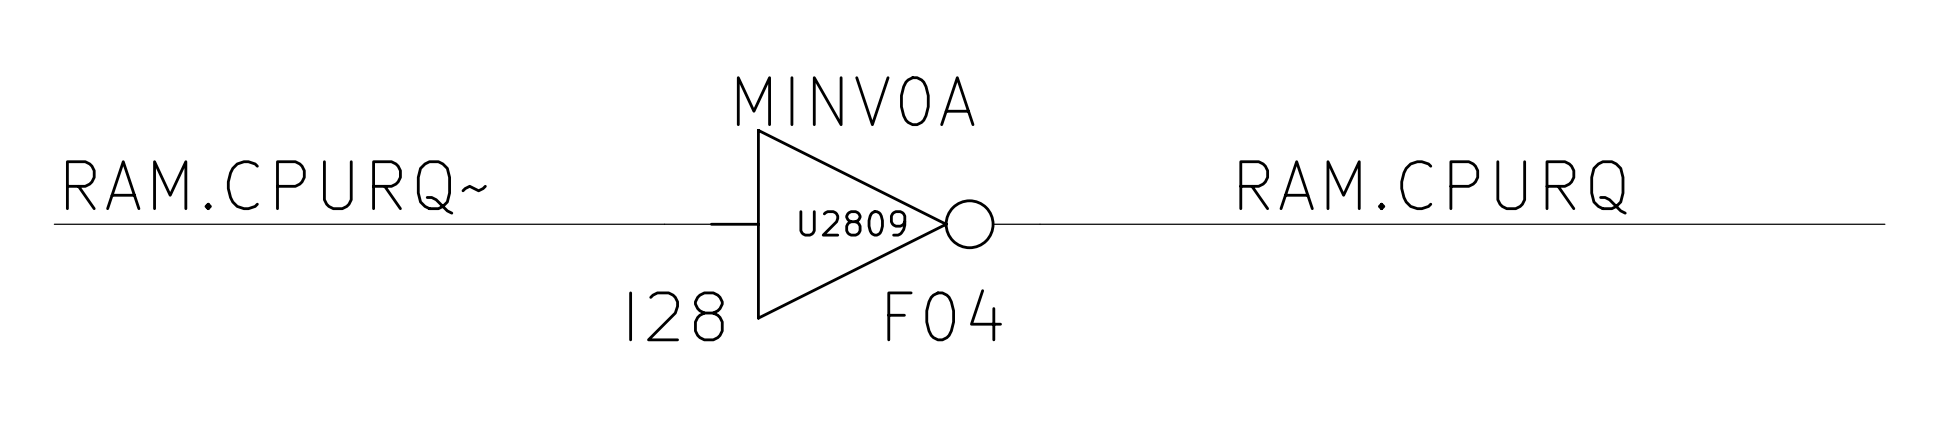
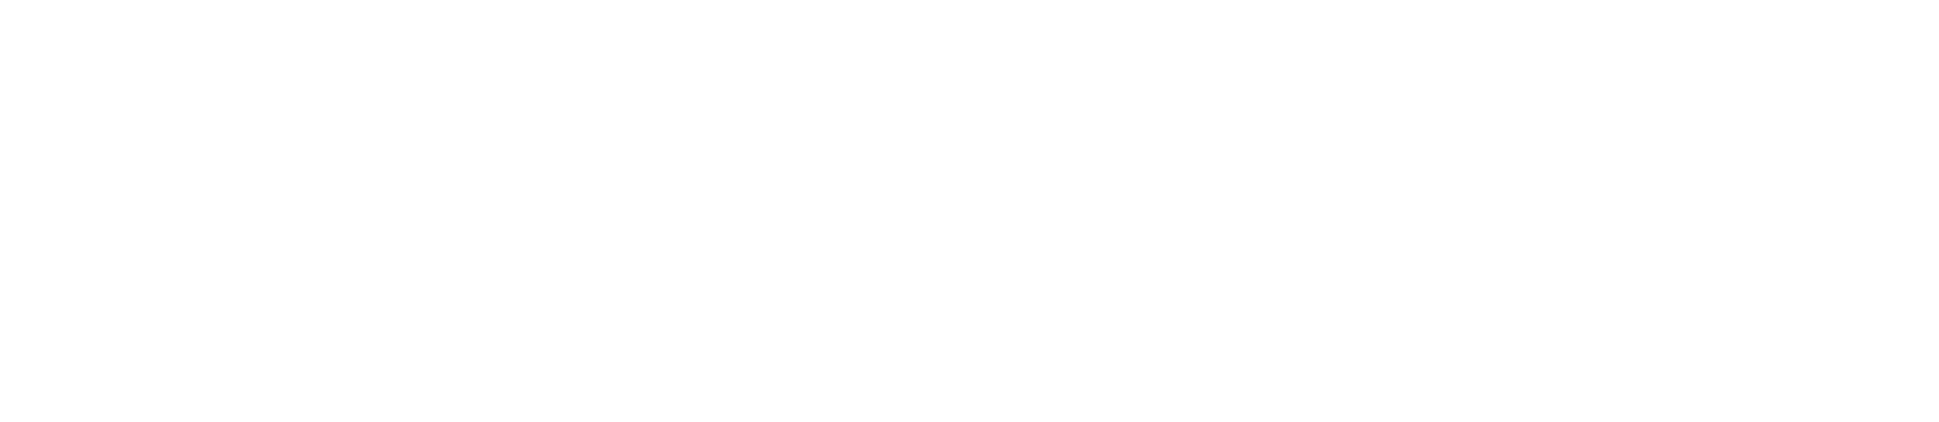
label: RAM.CPURQ~ (276, 187) -> none
label: RAM.CPURQ (1433, 187) -> none
wire: (54, 224) (664, 224) -> none
U2809: F04 (852, 224) -> none
wire: (1040, 224) (1884, 224) -> none

